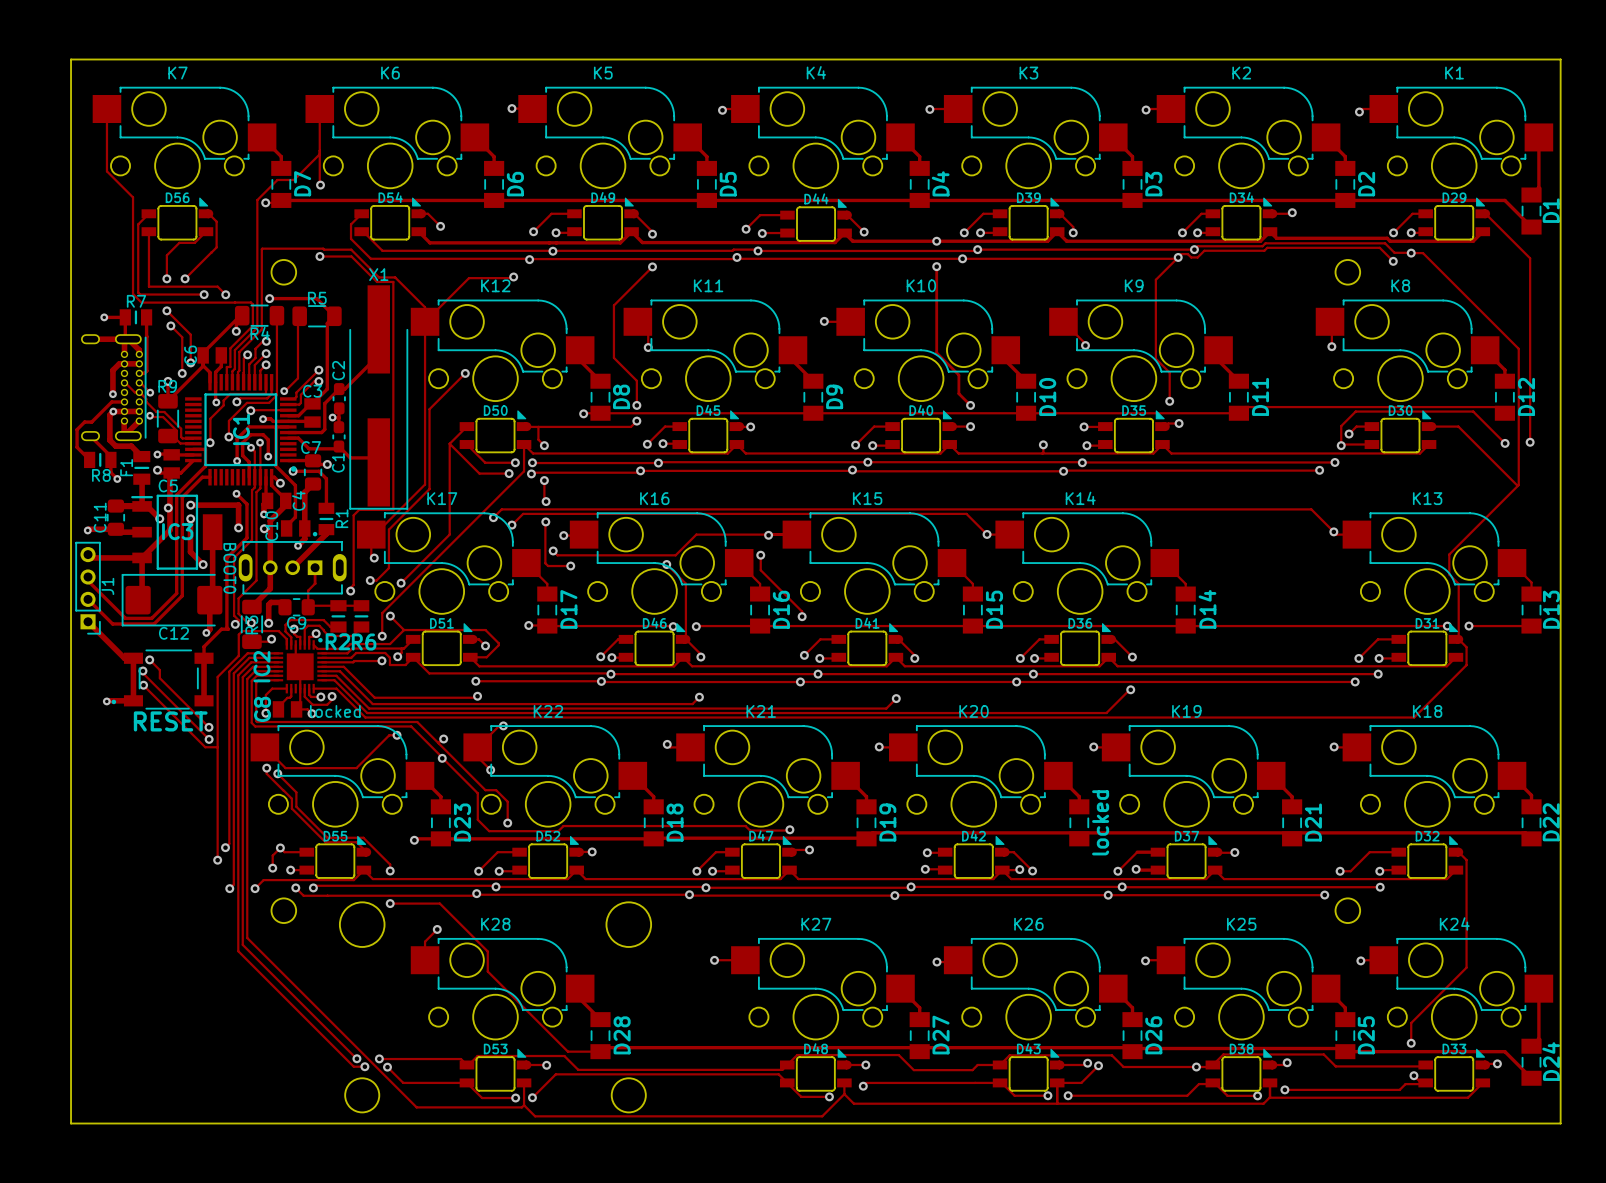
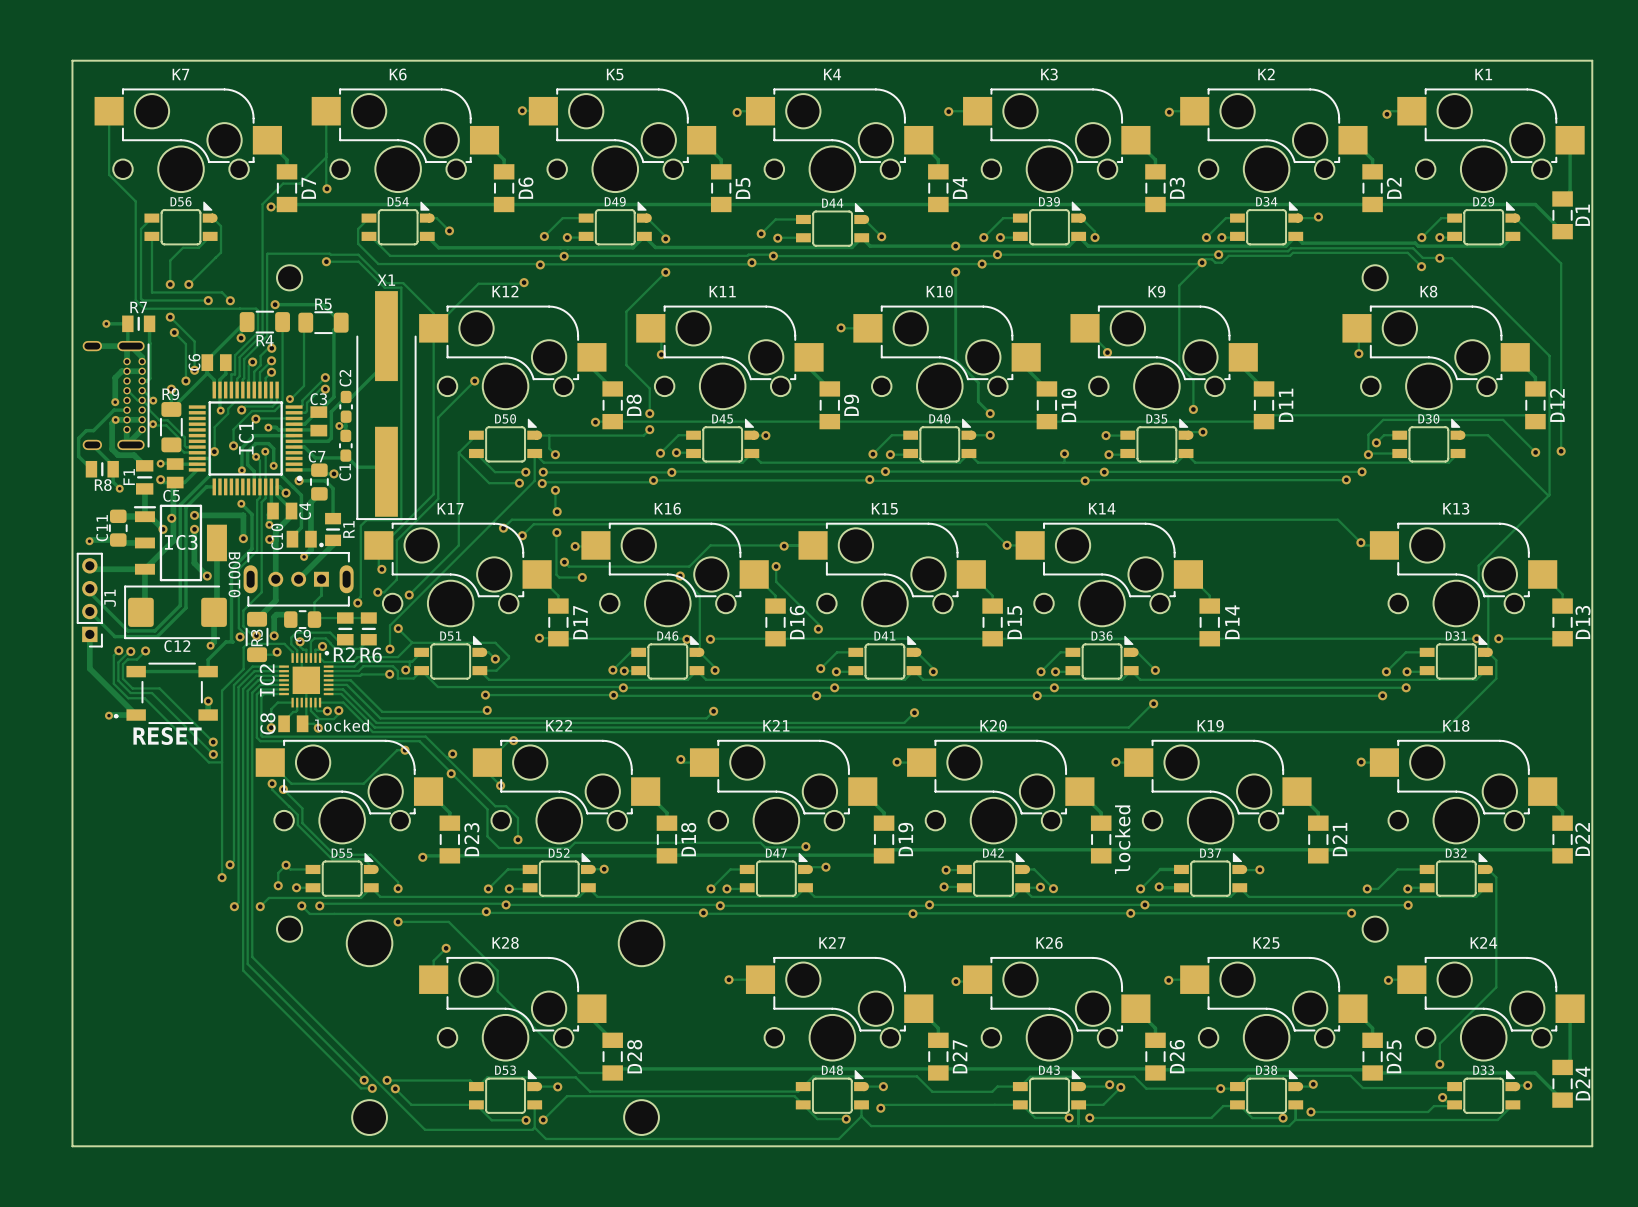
track: (88, 621) (124, 658) (133, 658) (133, 700) -> (89, 634) (89, 668) (136, 715)
via: none -> (118, 650)
via: none -> (130, 651)
via: none -> (145, 650)
track: (204, 658) (204, 687) -> (208, 671) (145, 671)
track: (149, 659) (159, 670) (159, 678) -> (145, 650) (137, 659) (127, 659) (122, 664) (122, 678) (132, 688) (159, 688) (163, 691)
via: (149, 659) -> none
track: (142, 671) (148, 679) -> (130, 651) (118, 662) (118, 680) (130, 693) (151, 693)
via: (142, 671) -> none
track: (143, 685) (205, 747) -> (118, 650) (113, 655) (113, 683) (128, 698) (144, 698) (209, 762)
via: (143, 685) -> none
via: none -> (208, 701)

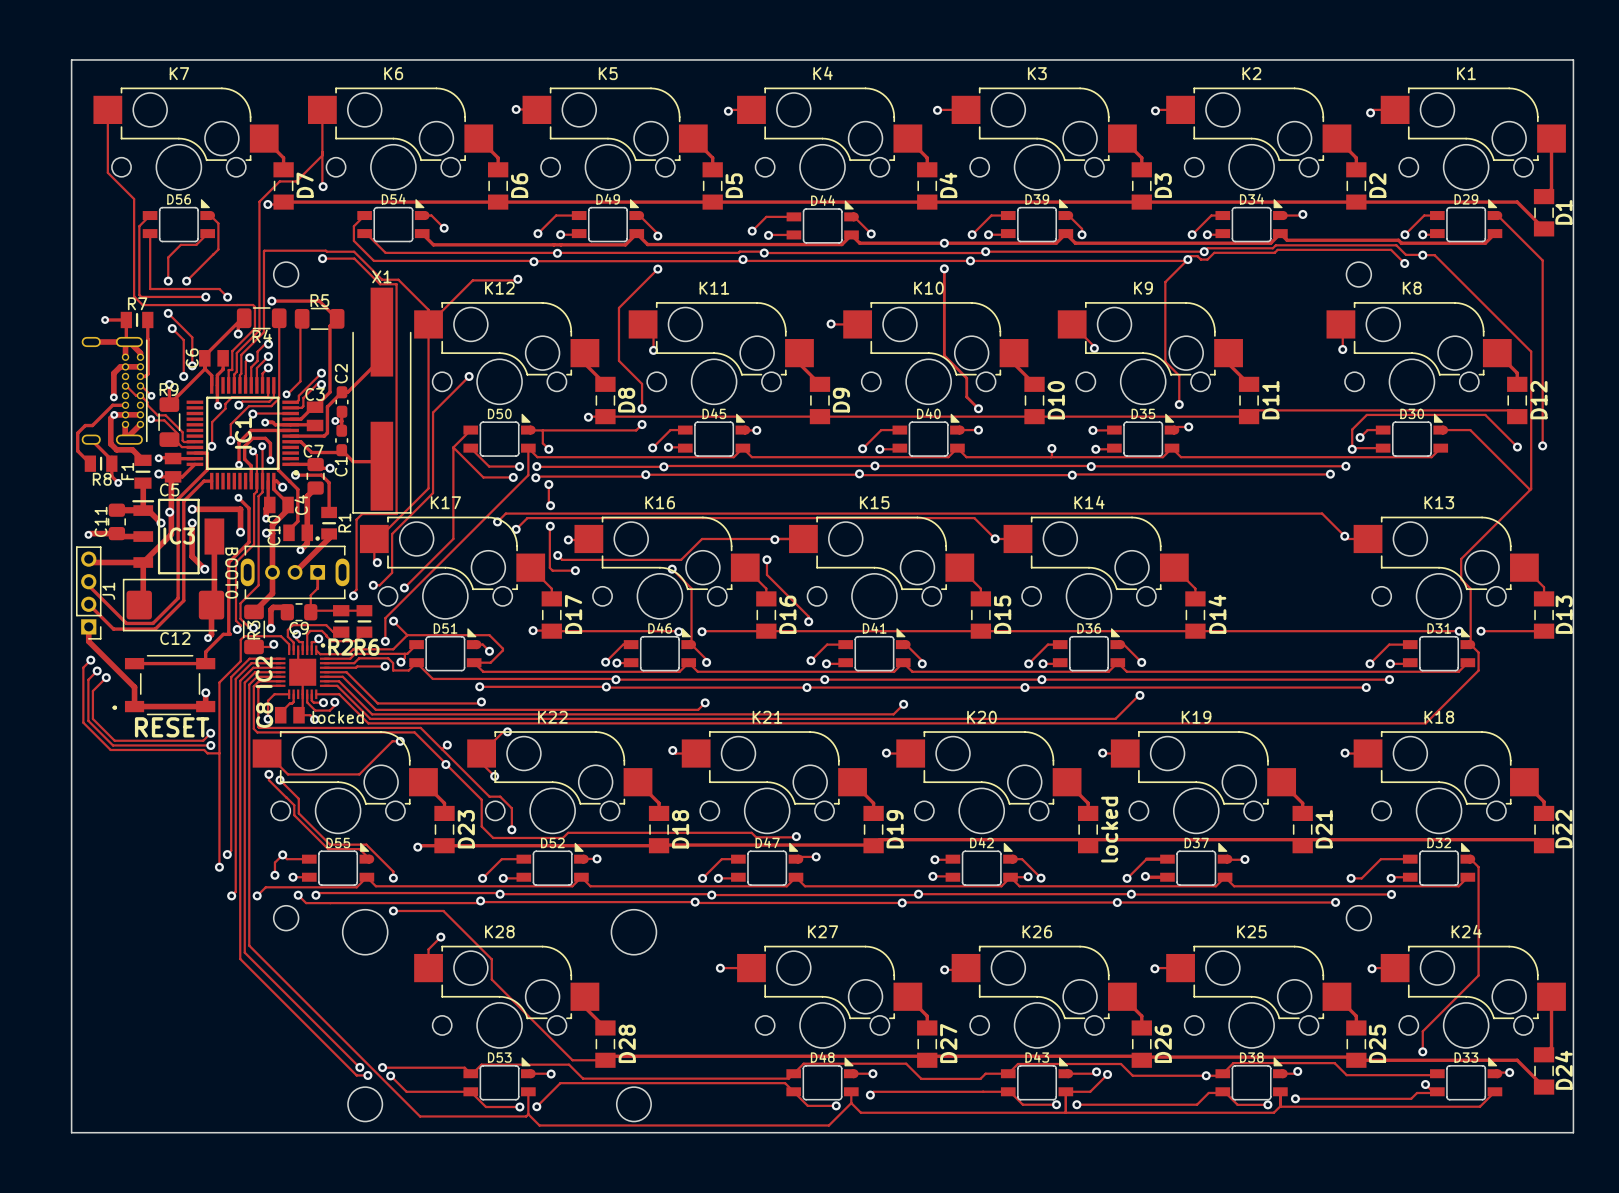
track: (89, 649) (89, 668) (136, 715) (108, 715) -> (88, 641) (134, 687) (134, 706) (205, 706)
track: (118, 650) (113, 655) (113, 683) (128, 698) (144, 698) (210, 762) -> (90, 660) (83, 667) (83, 722) (110, 749) (204, 749) (207, 753)
via: (118, 650) -> none
track: (145, 650) (137, 659) (127, 659) (122, 664) (122, 678) (132, 688) (159, 688) (213, 742) -> (106, 677) (92, 691) (92, 718) (114, 740) (203, 740) (210, 733)
via: (145, 650) -> none
track: (130, 651) (118, 662) (118, 680) (130, 693) (151, 693) (213, 754) -> (97, 670) (88, 679) (88, 720) (113, 745) (210, 745)
via: (130, 651) -> none
via: none -> (90, 660)
via: none -> (97, 670)
via: none -> (106, 677)
via: (108, 715) -> none

